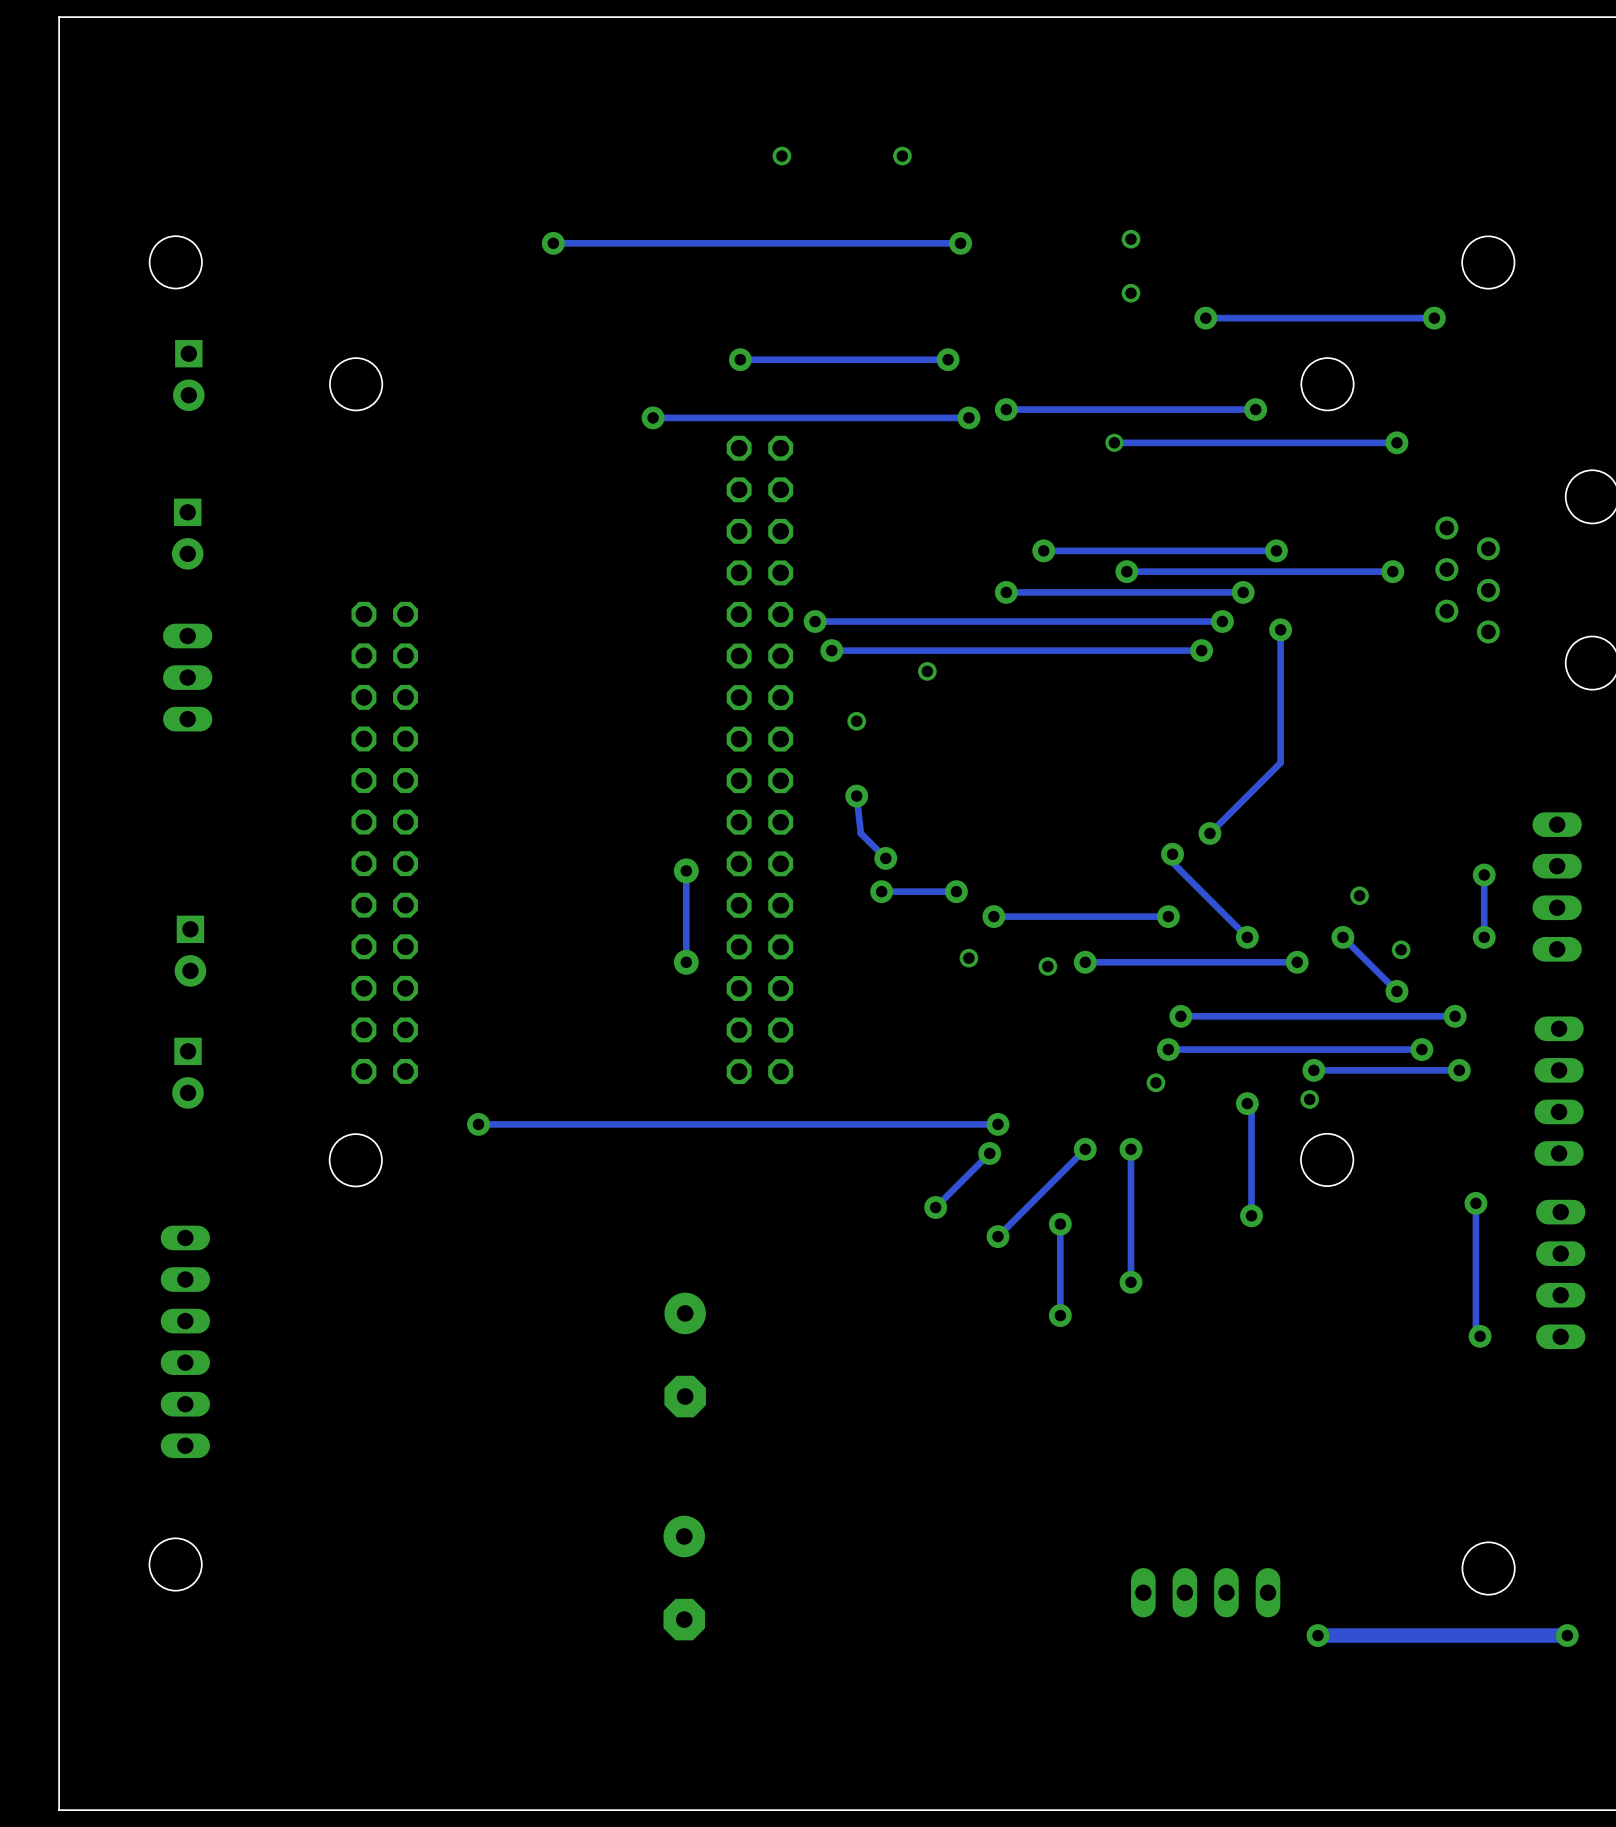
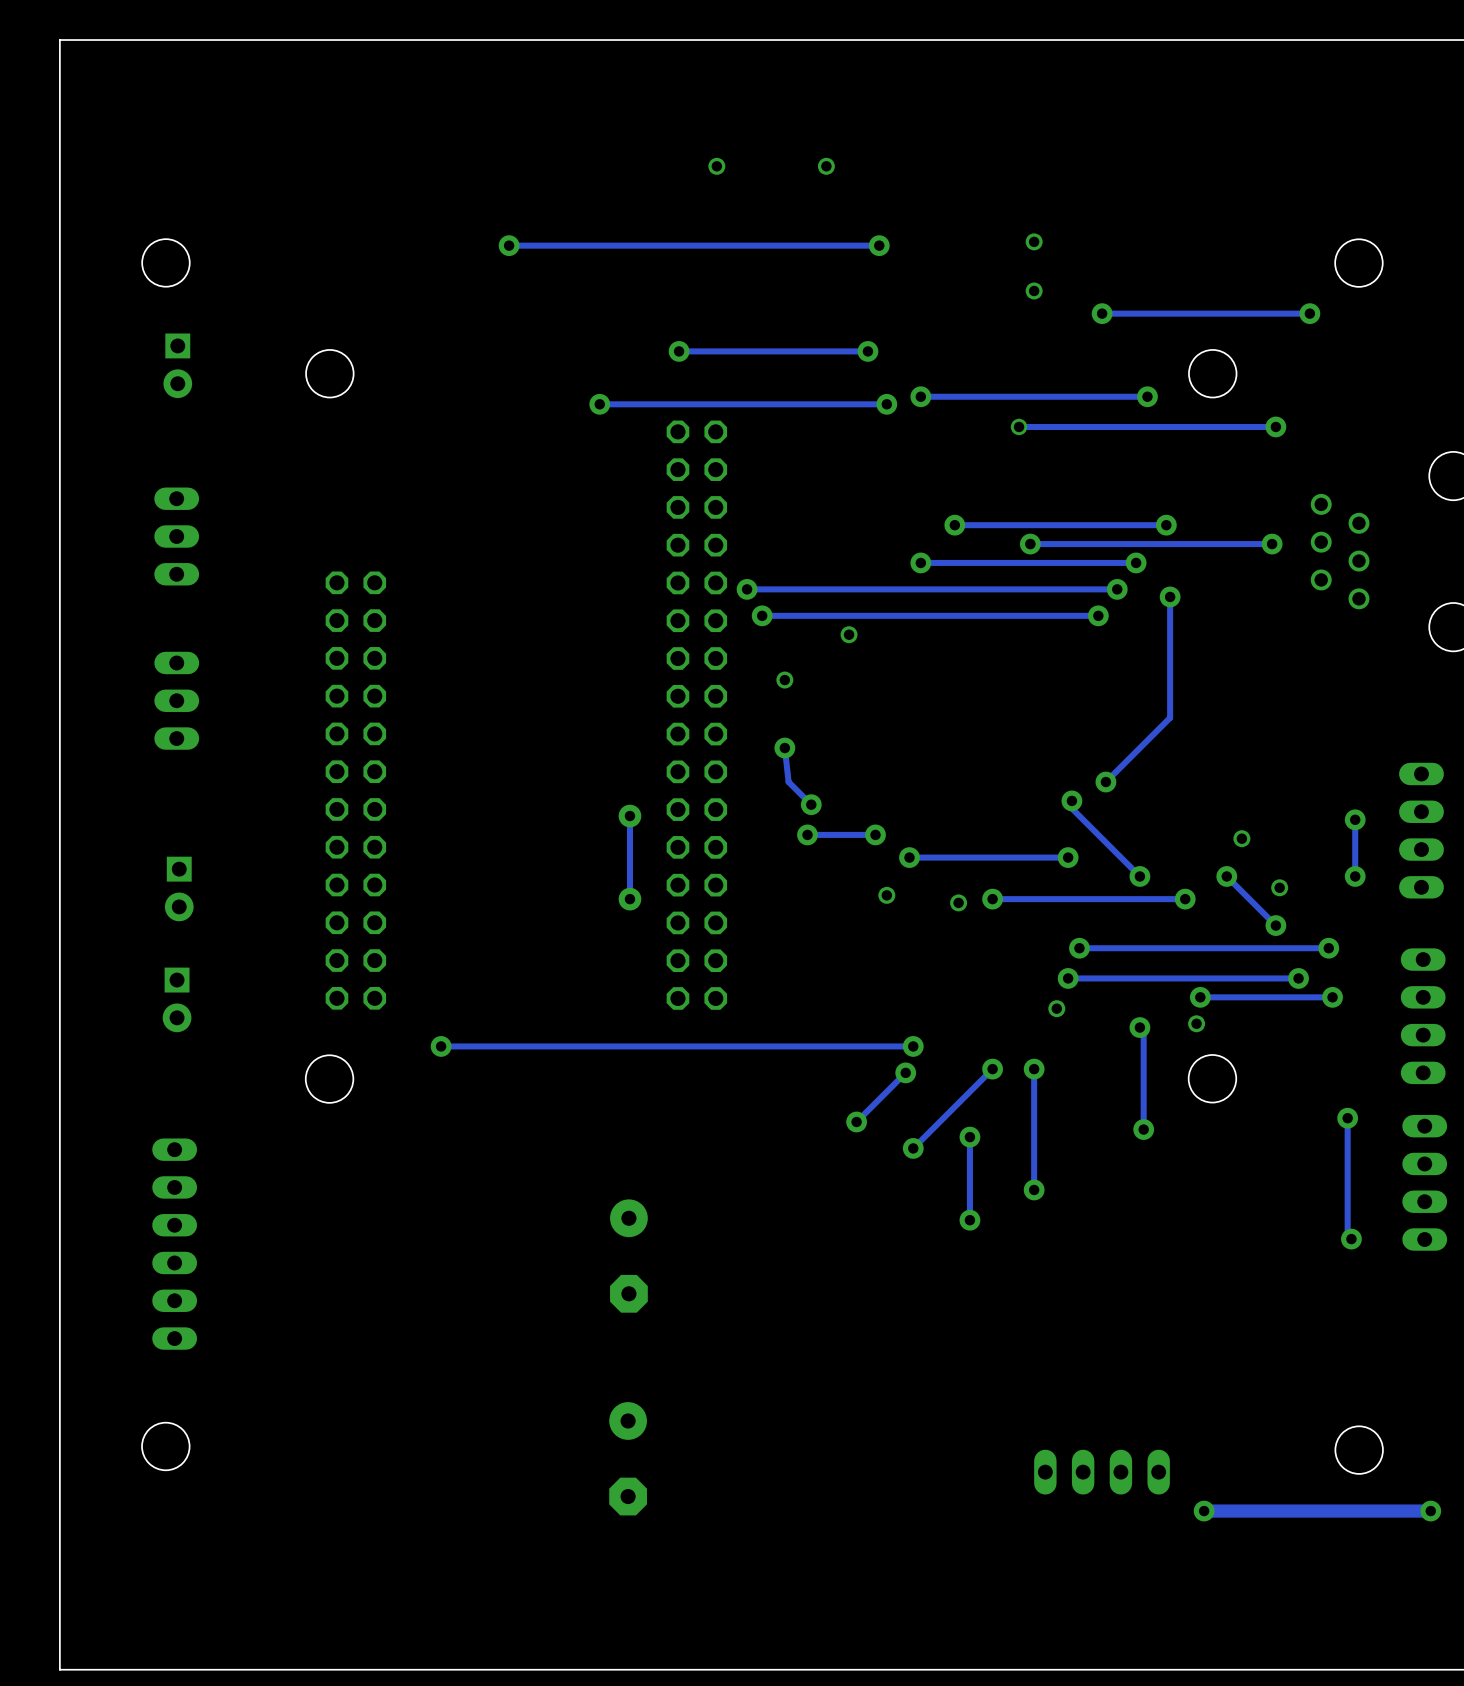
part: (187, 534) -> none
part: none -> (176, 536)
part: (187, 677) -> none
part: none -> (176, 700)

